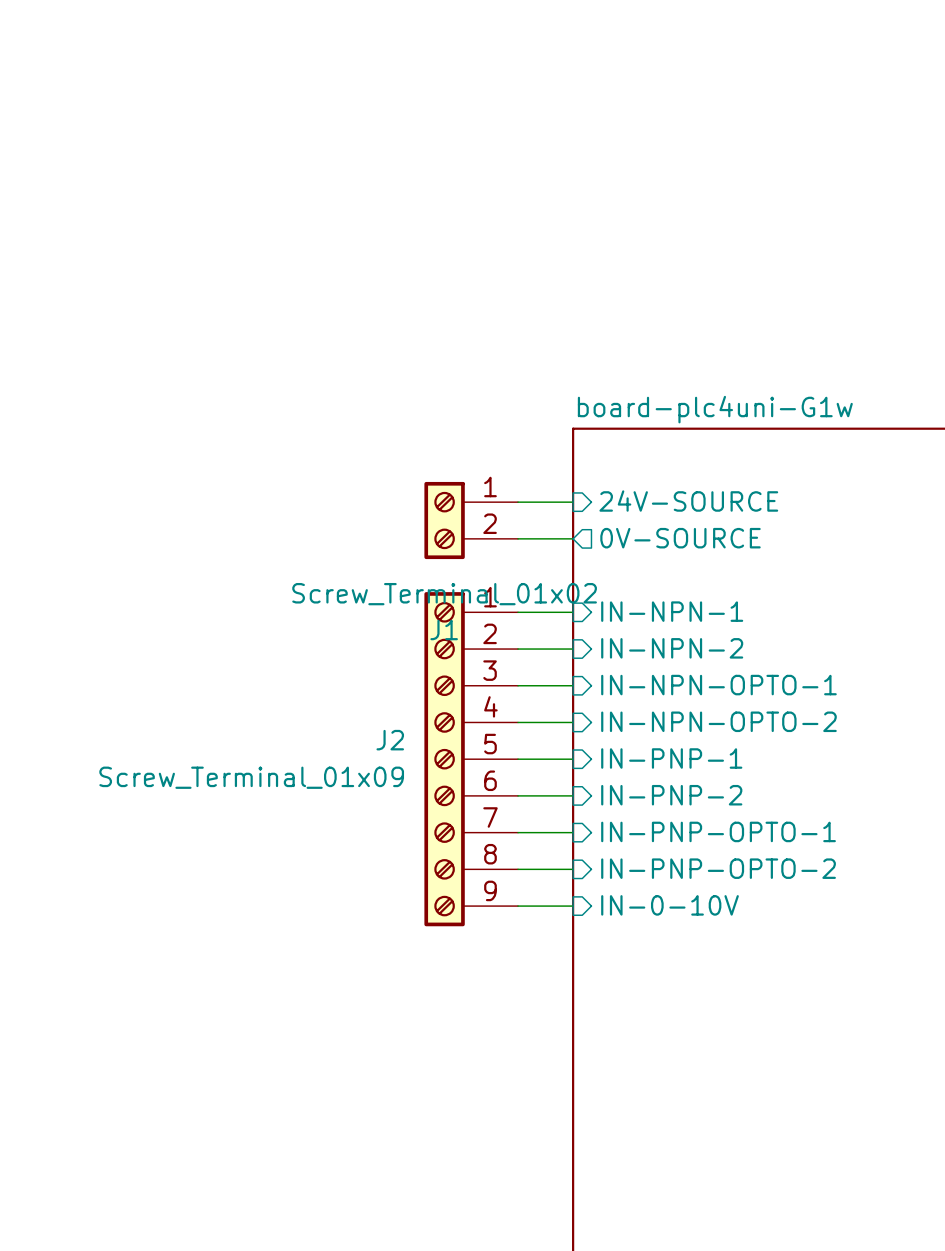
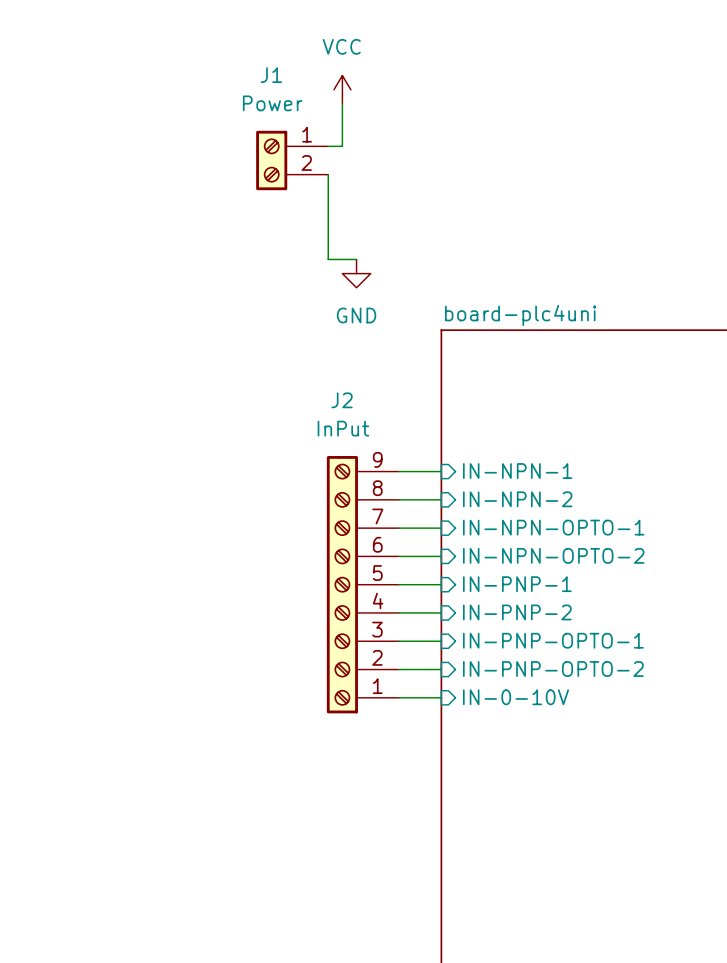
power symbol: none -> VCC (342, 89)
wire: none -> (342, 103) (342, 146) (328, 146)
wire: none -> (328, 174) (328, 259) (356, 259)
power symbol: none -> GND (356, 273)
sheet board-plc4uni-G1w name: board-plc4uni-G1w (715, 409) -> board-plc4uni (520, 315)
sheet pin: 24V-SOURCE (688, 501) -> none
wire: (518, 502) (573, 502) -> none
J1 position: (471, 520) -> (292, 160)
wire: (518, 538) (573, 538) -> none
sheet pin: 0V-SOURCE (680, 538) -> none
J1 value: Screw_Terminal_01x02 (444, 594) -> Power (272, 103)
J1 name position: J1 (444, 629) -> J1 (271, 75)
J2 name position: J2 (390, 740) -> J2 (342, 400)
J2 flip: as is (444, 759) -> up-down (342, 584)
J2 value: Screw_Terminal_01x09 (251, 777) -> InPut (343, 428)

